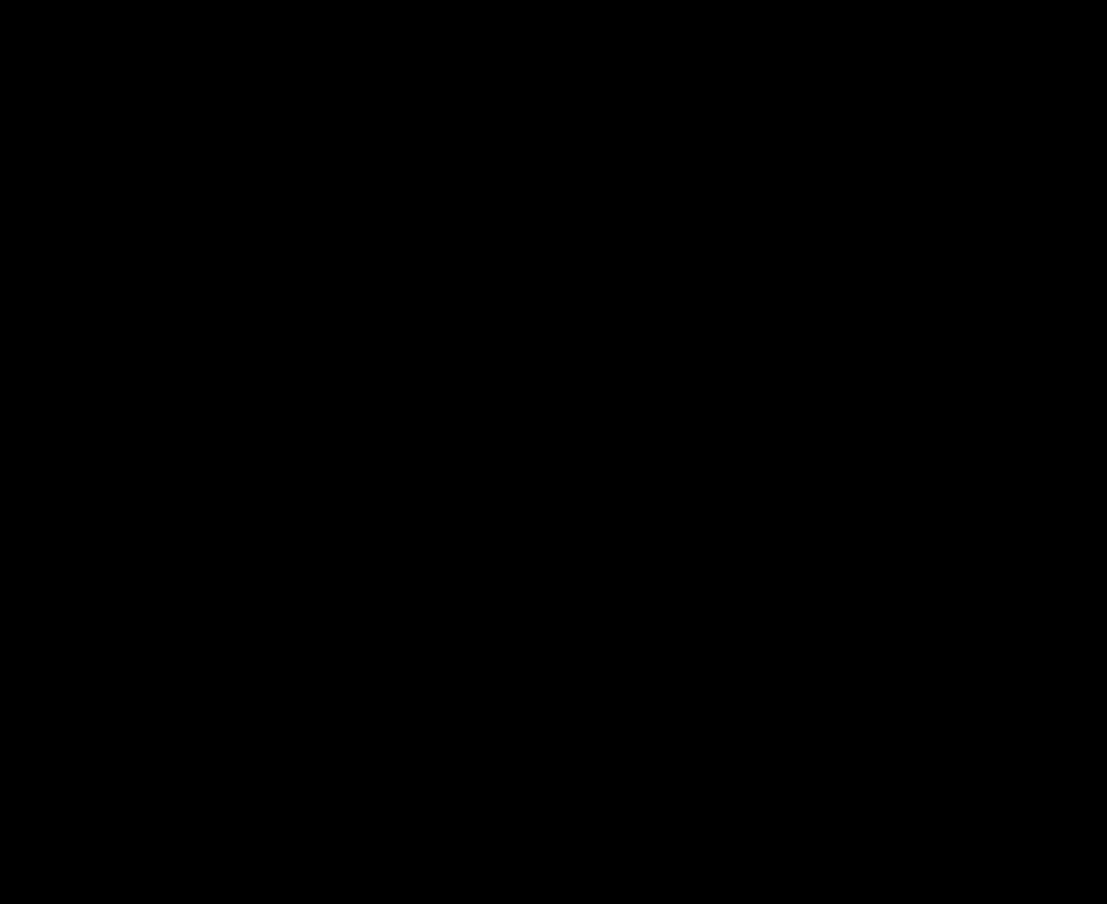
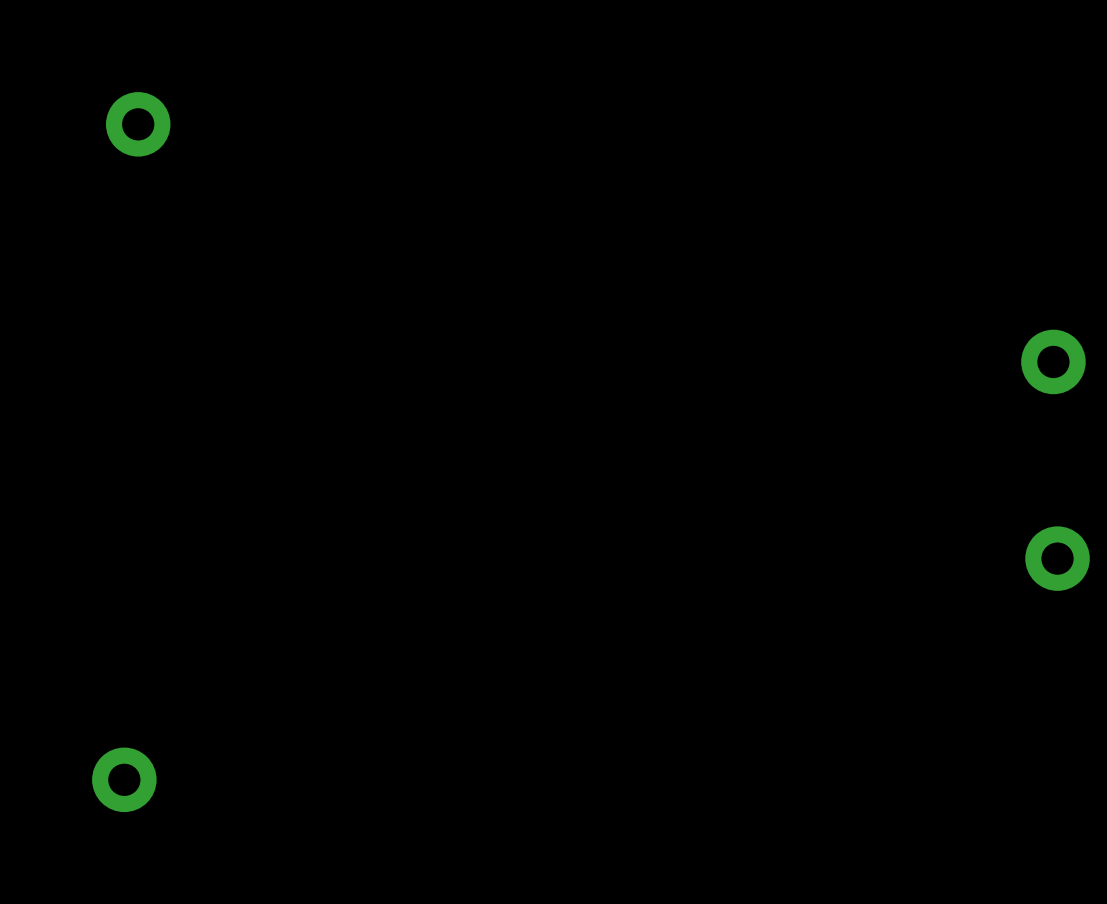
part: none -> (138, 124)
part: none -> (1053, 361)
part: none -> (1057, 558)
part: none -> (124, 779)

